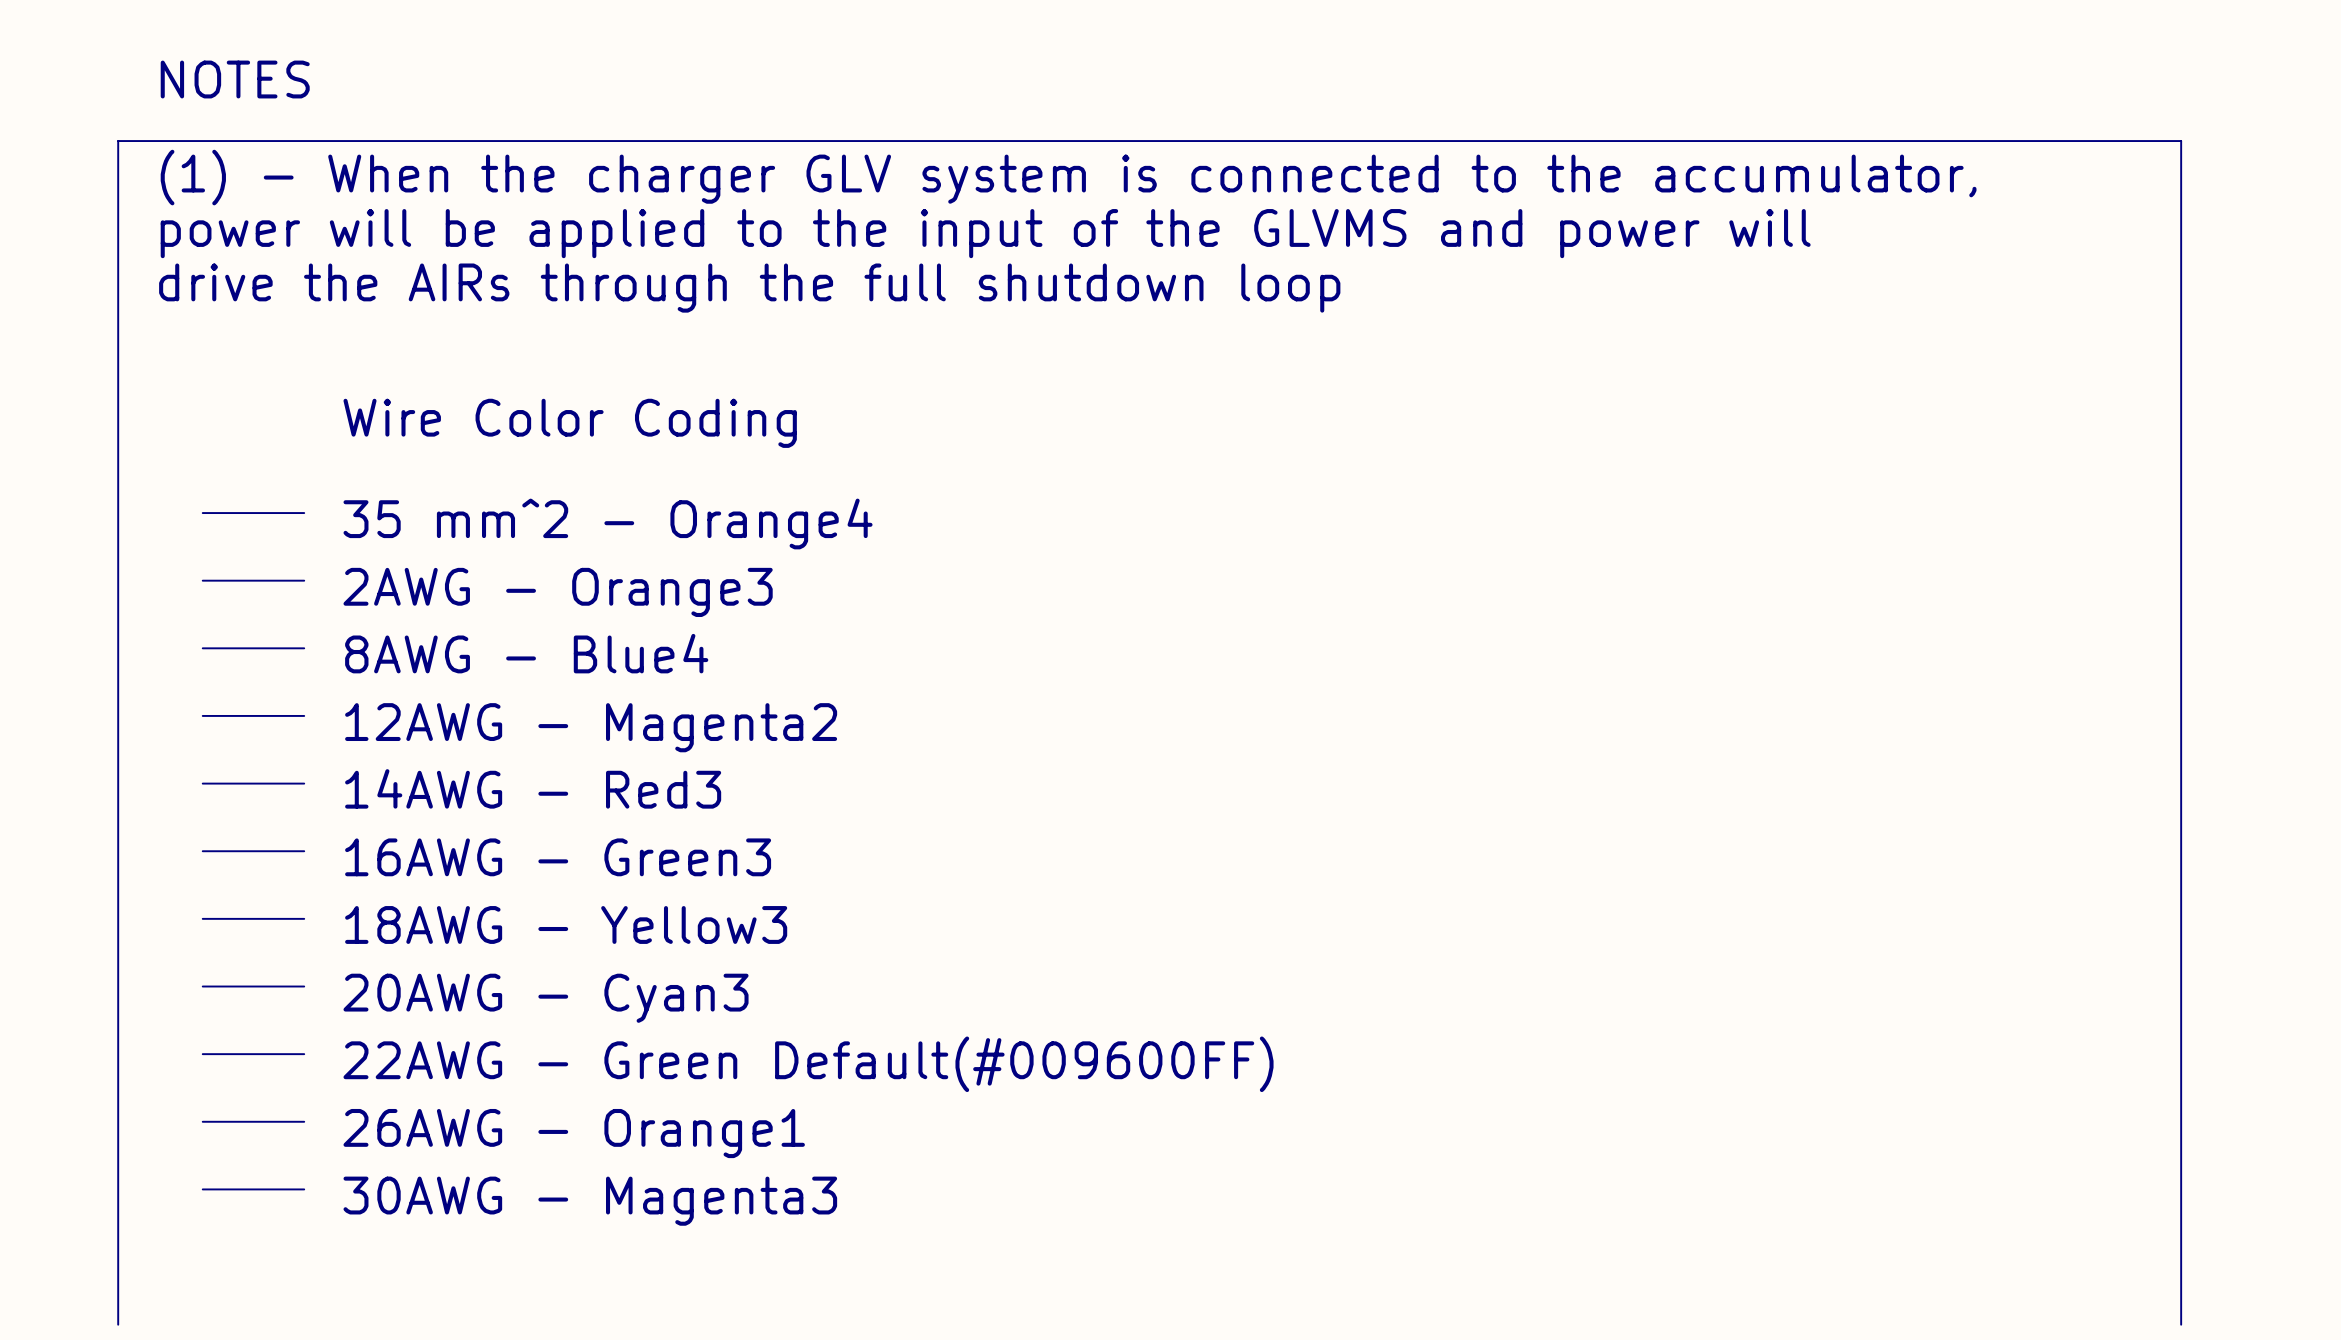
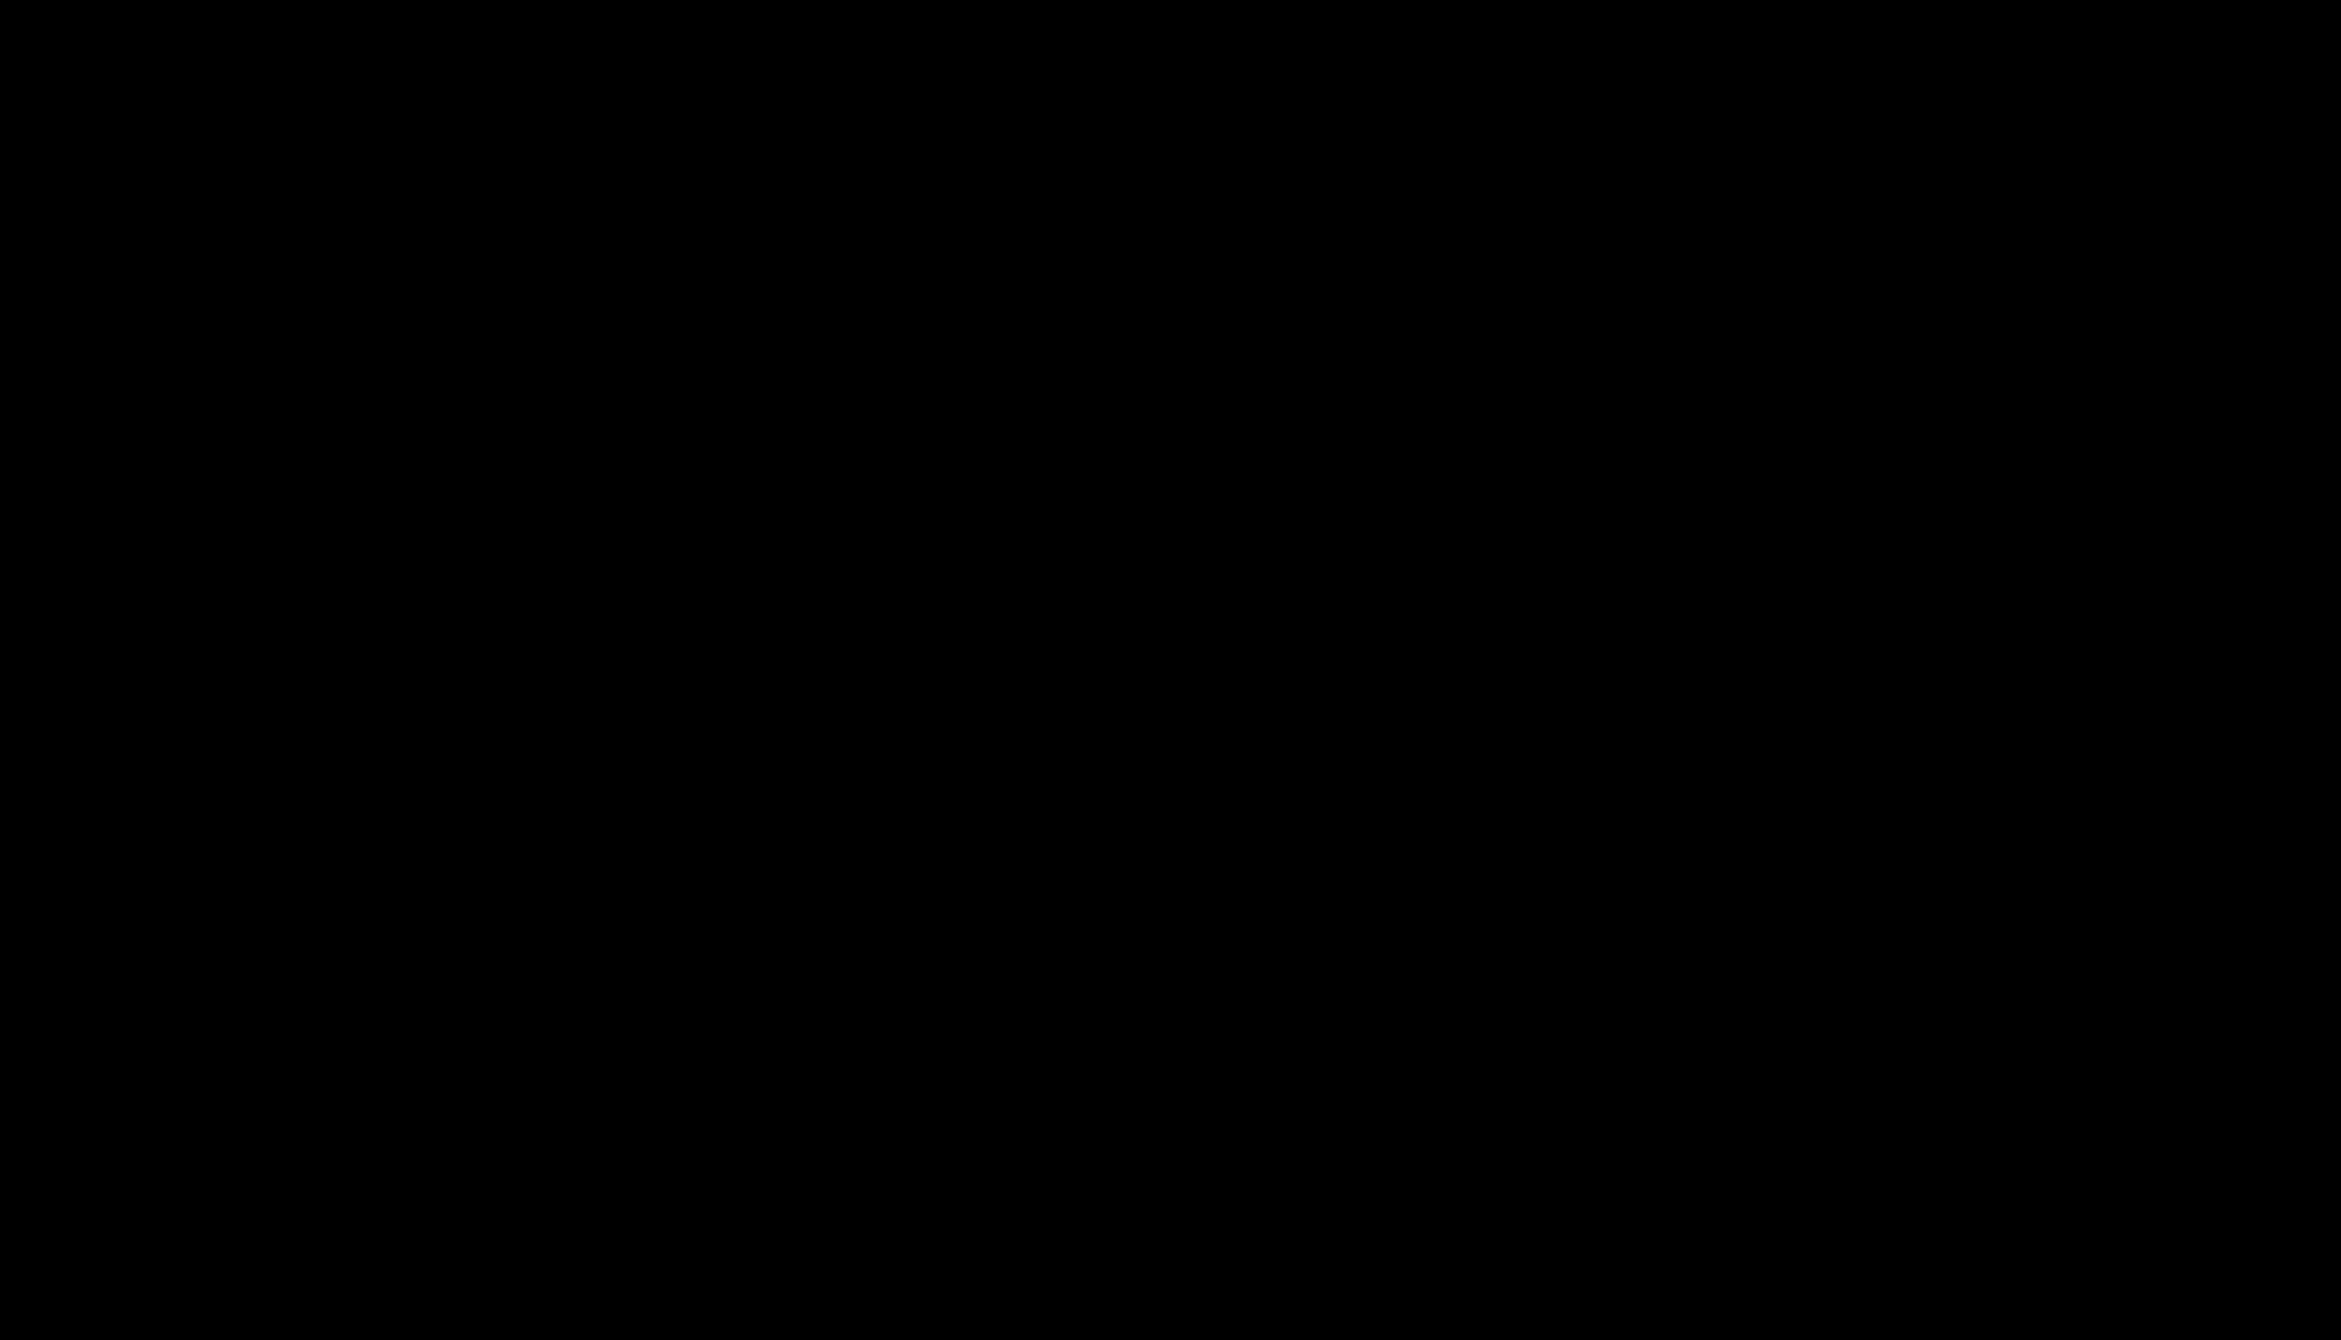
text: NOTES (235, 79) -> none
text: (1) - When the charger GLV system is connected to the accumulator, (1068, 177) -> none
text: power will be applied to the input of the GLVMS and power will (985, 233) -> none
text: drive the AIRs through the full shutdown loop (749, 288) -> none
text: Wire Color Coding (570, 423) -> none
wire: (202, 513) (304, 513) -> none
text: 35 mm^2 - Orange4 (608, 523) -> none
wire: (202, 580) (304, 580) -> none
text: 2AWG - Orange3 (558, 592) -> none
wire: (202, 648) (304, 648) -> none
text: 8AWG - Blue4 (526, 653) -> none
wire: (202, 715) (304, 715) -> none
text: 12AWG - Magenta2 (591, 727) -> none
wire: (202, 783) (304, 783) -> none
text: 14AWG - Red3 (533, 788) -> none
wire: (202, 851) (304, 851) -> none
text: 16AWG - Green3 (558, 857) -> none
wire: (202, 918) (304, 918) -> none
text: 18AWG - Yellow3 (566, 924) -> none
wire: (202, 986) (304, 986) -> none
text: 20AWG - Cyan3 (546, 998) -> none
wire: (202, 1054) (304, 1054) -> none
text: 22AWG - Green Default(#009600FF) (808, 1064) -> none
wire: (202, 1121) (304, 1121) -> none
text: 26AWG - Orange1 (574, 1133) -> none
wire: (202, 1189) (304, 1189) -> none
text: 30AWG - Magenta3 (590, 1201) -> none
line: (118, 1324) (118, 141) (2181, 141) (2181, 1324) -> none

